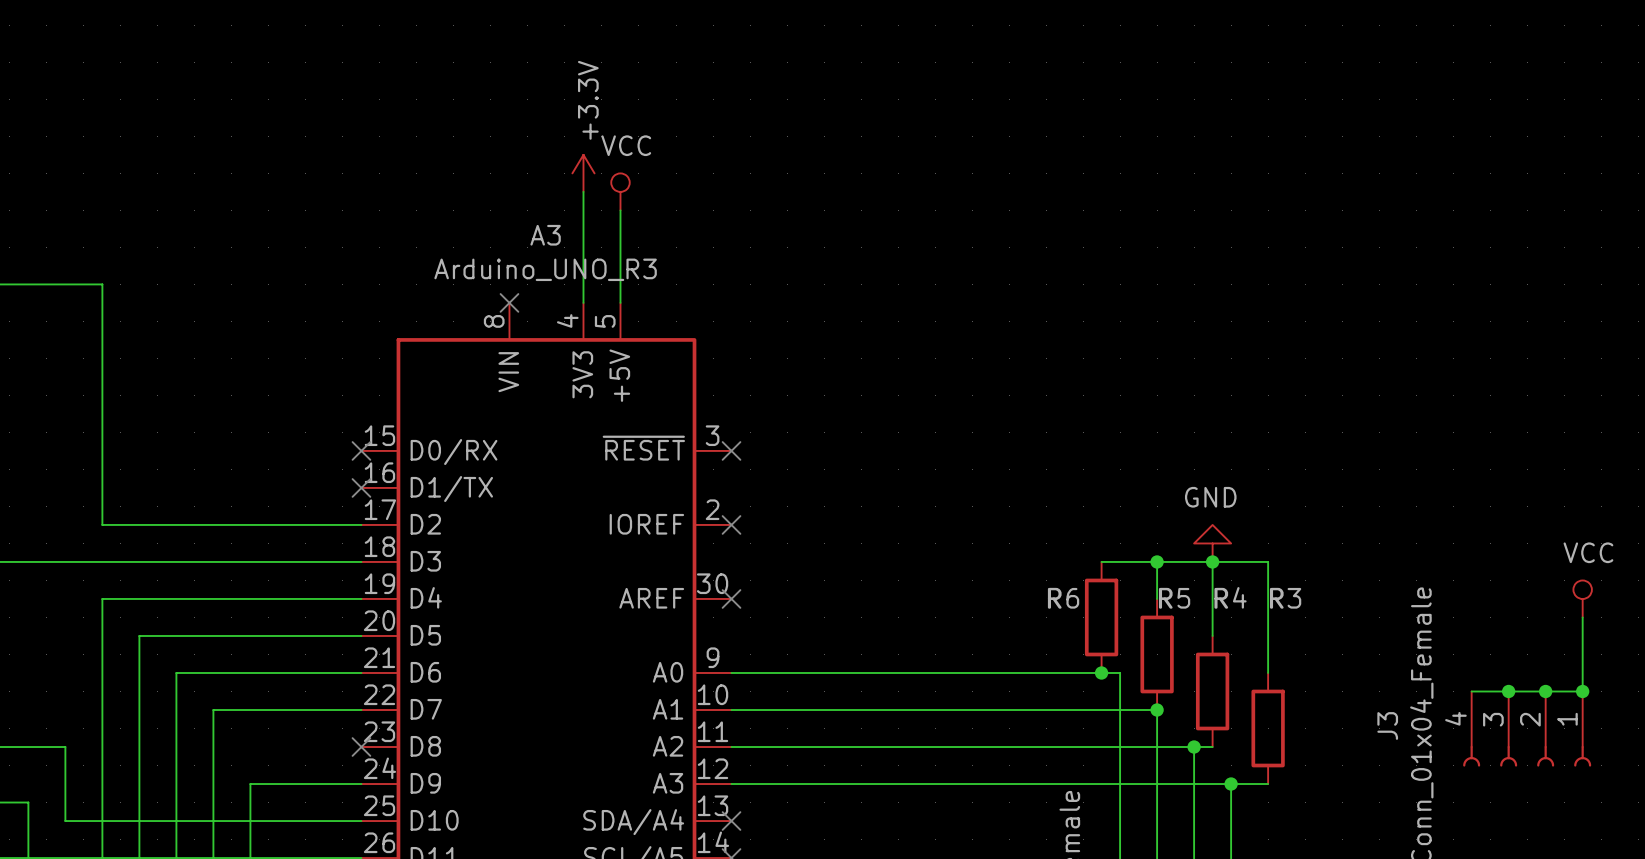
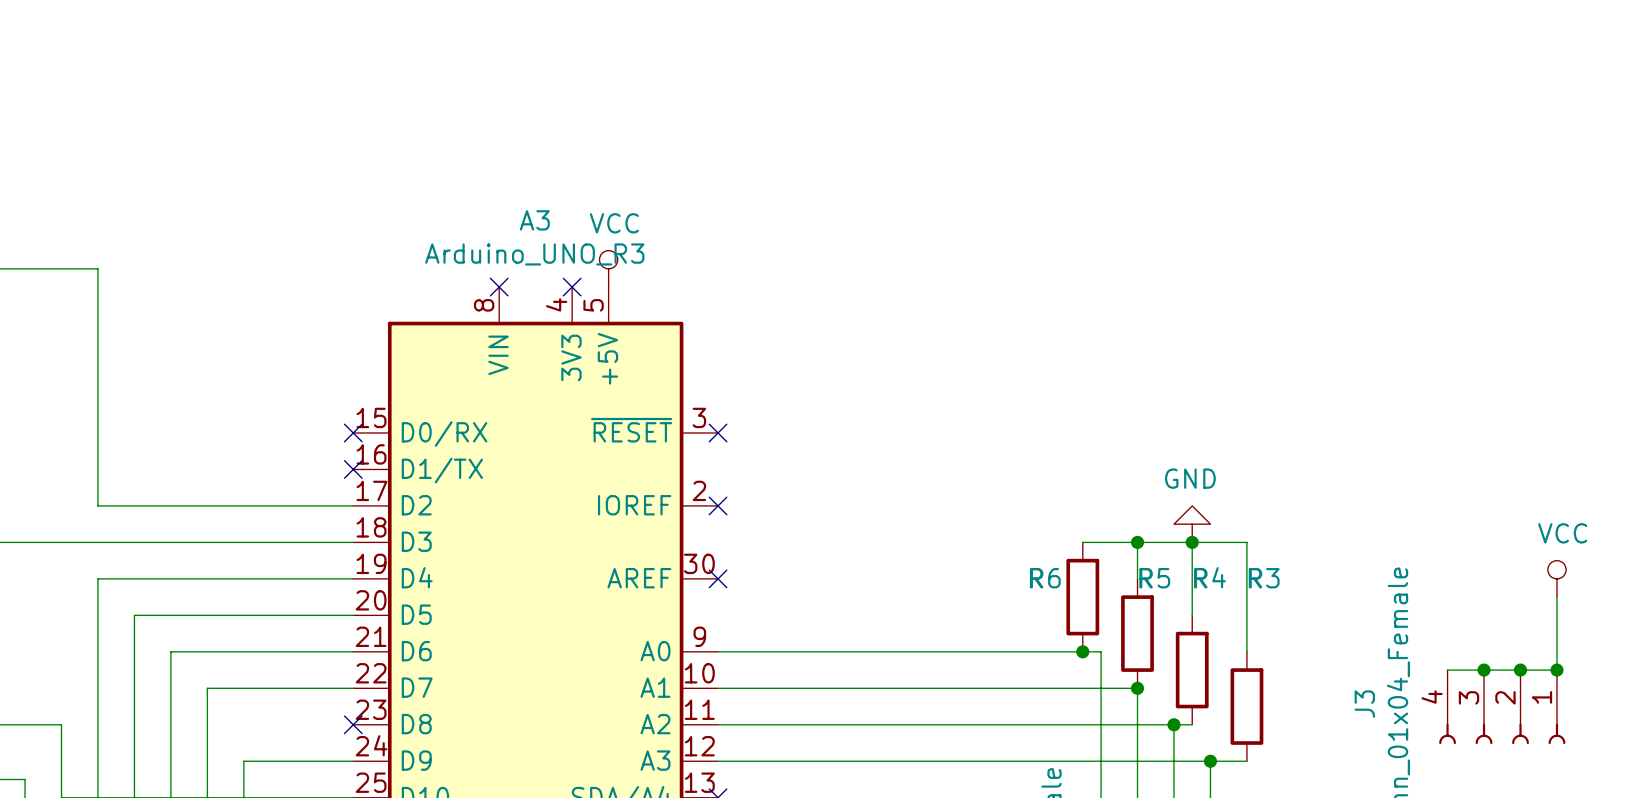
power symbol: +3.3V (583, 173) -> none
wire: (583, 191) (583, 302) -> none
power symbol position: VCC (620, 191) -> VCC (608, 268)
wire: (620, 210) (620, 302) -> none
no-connect mark: none -> (572, 287)

